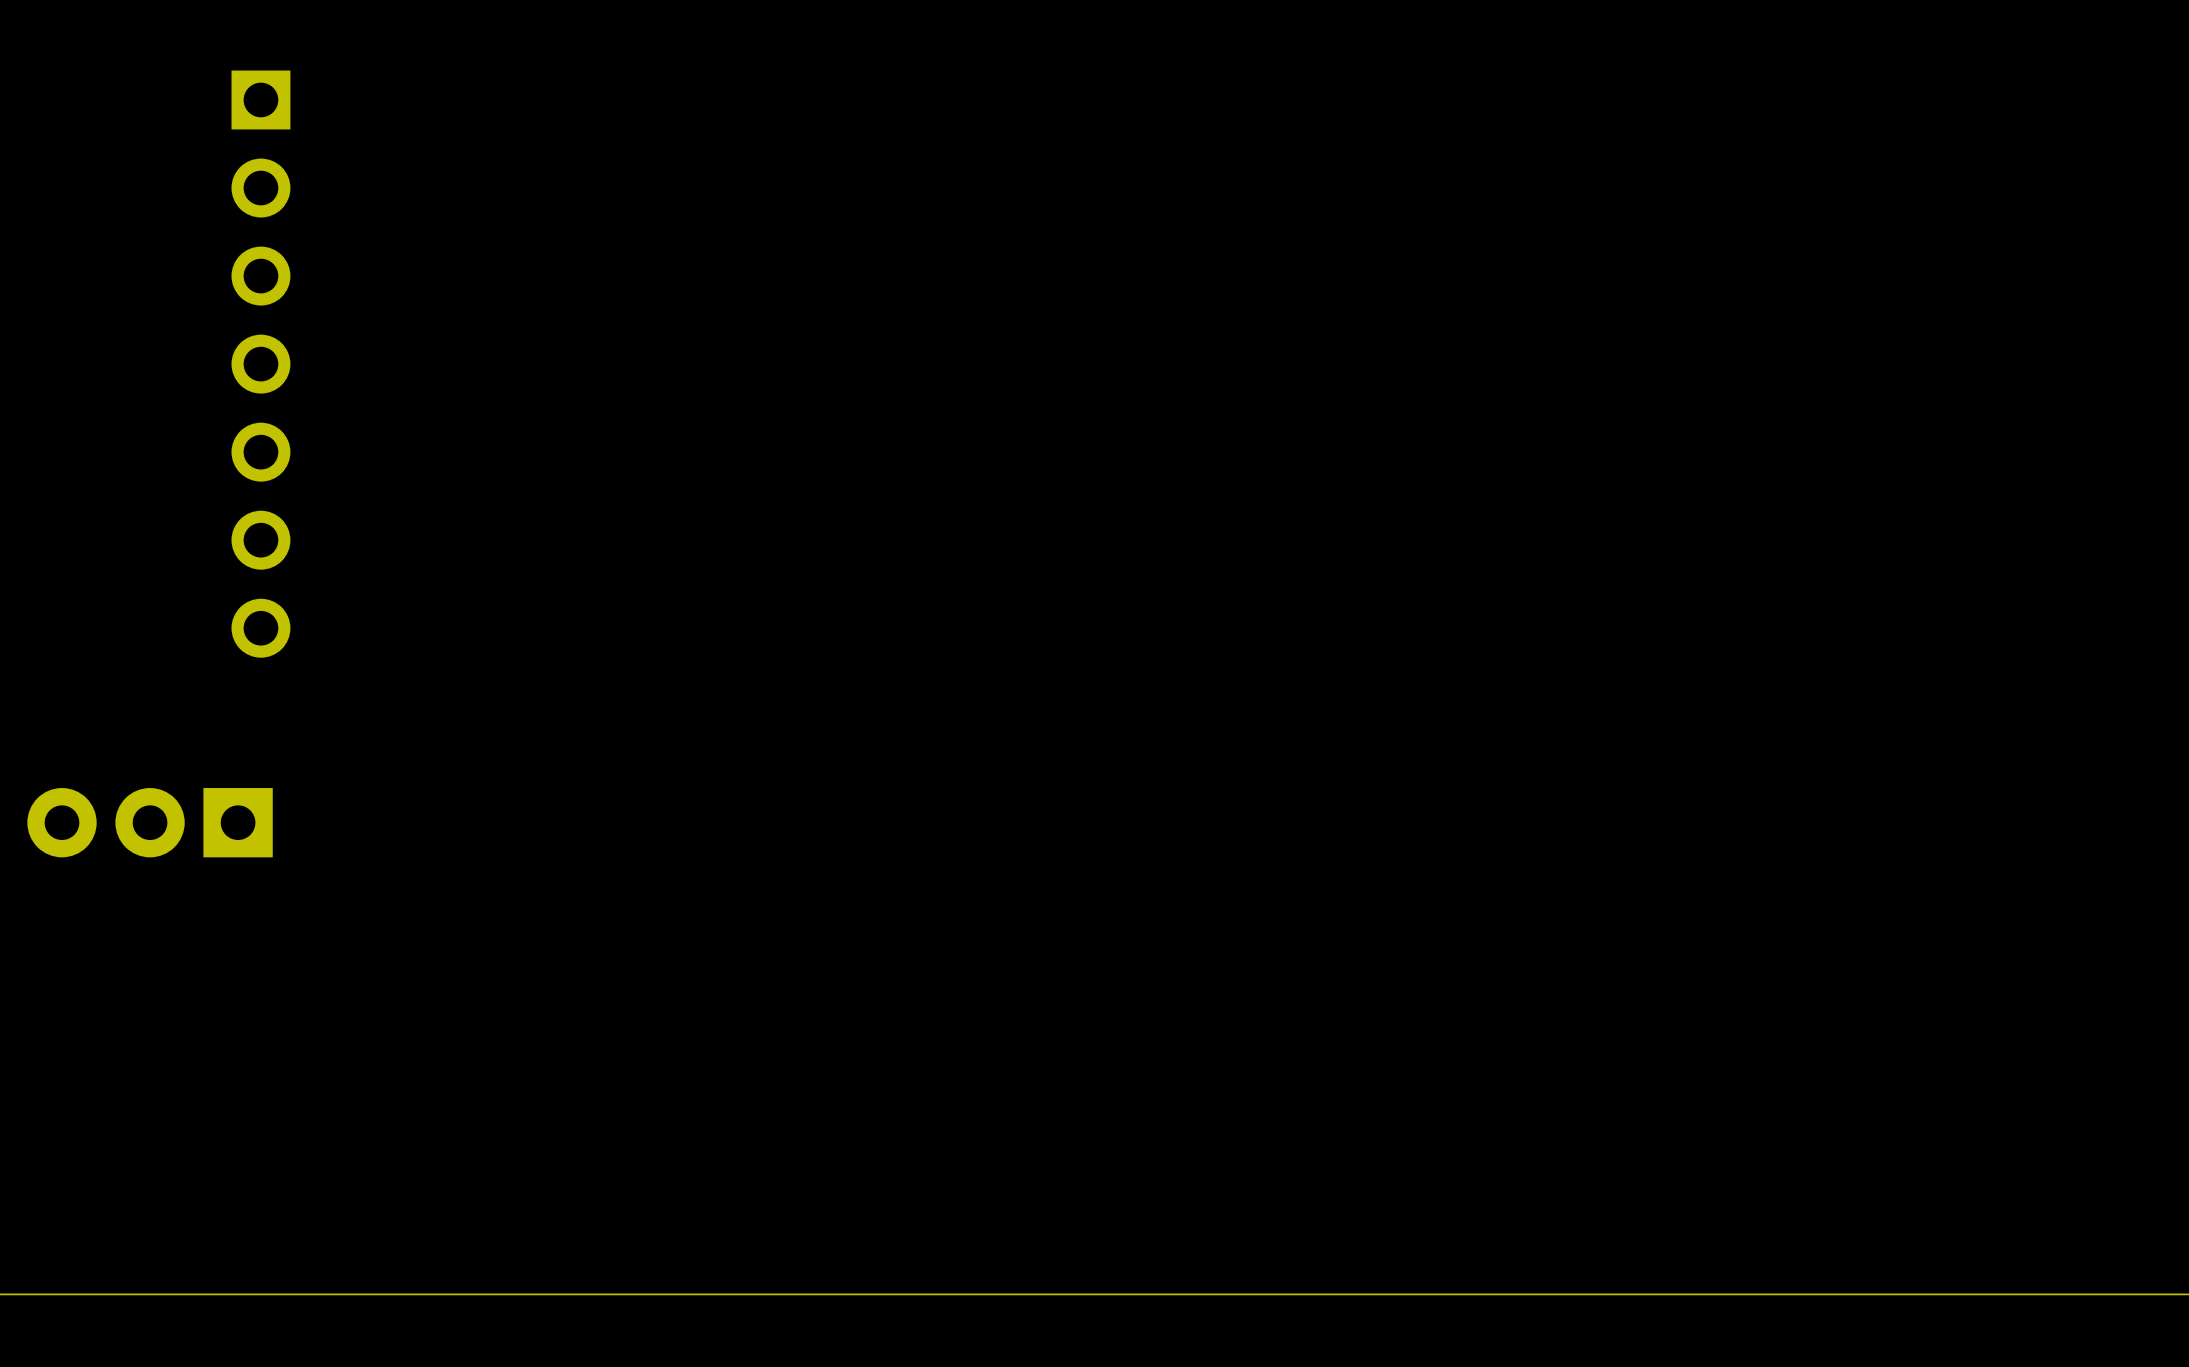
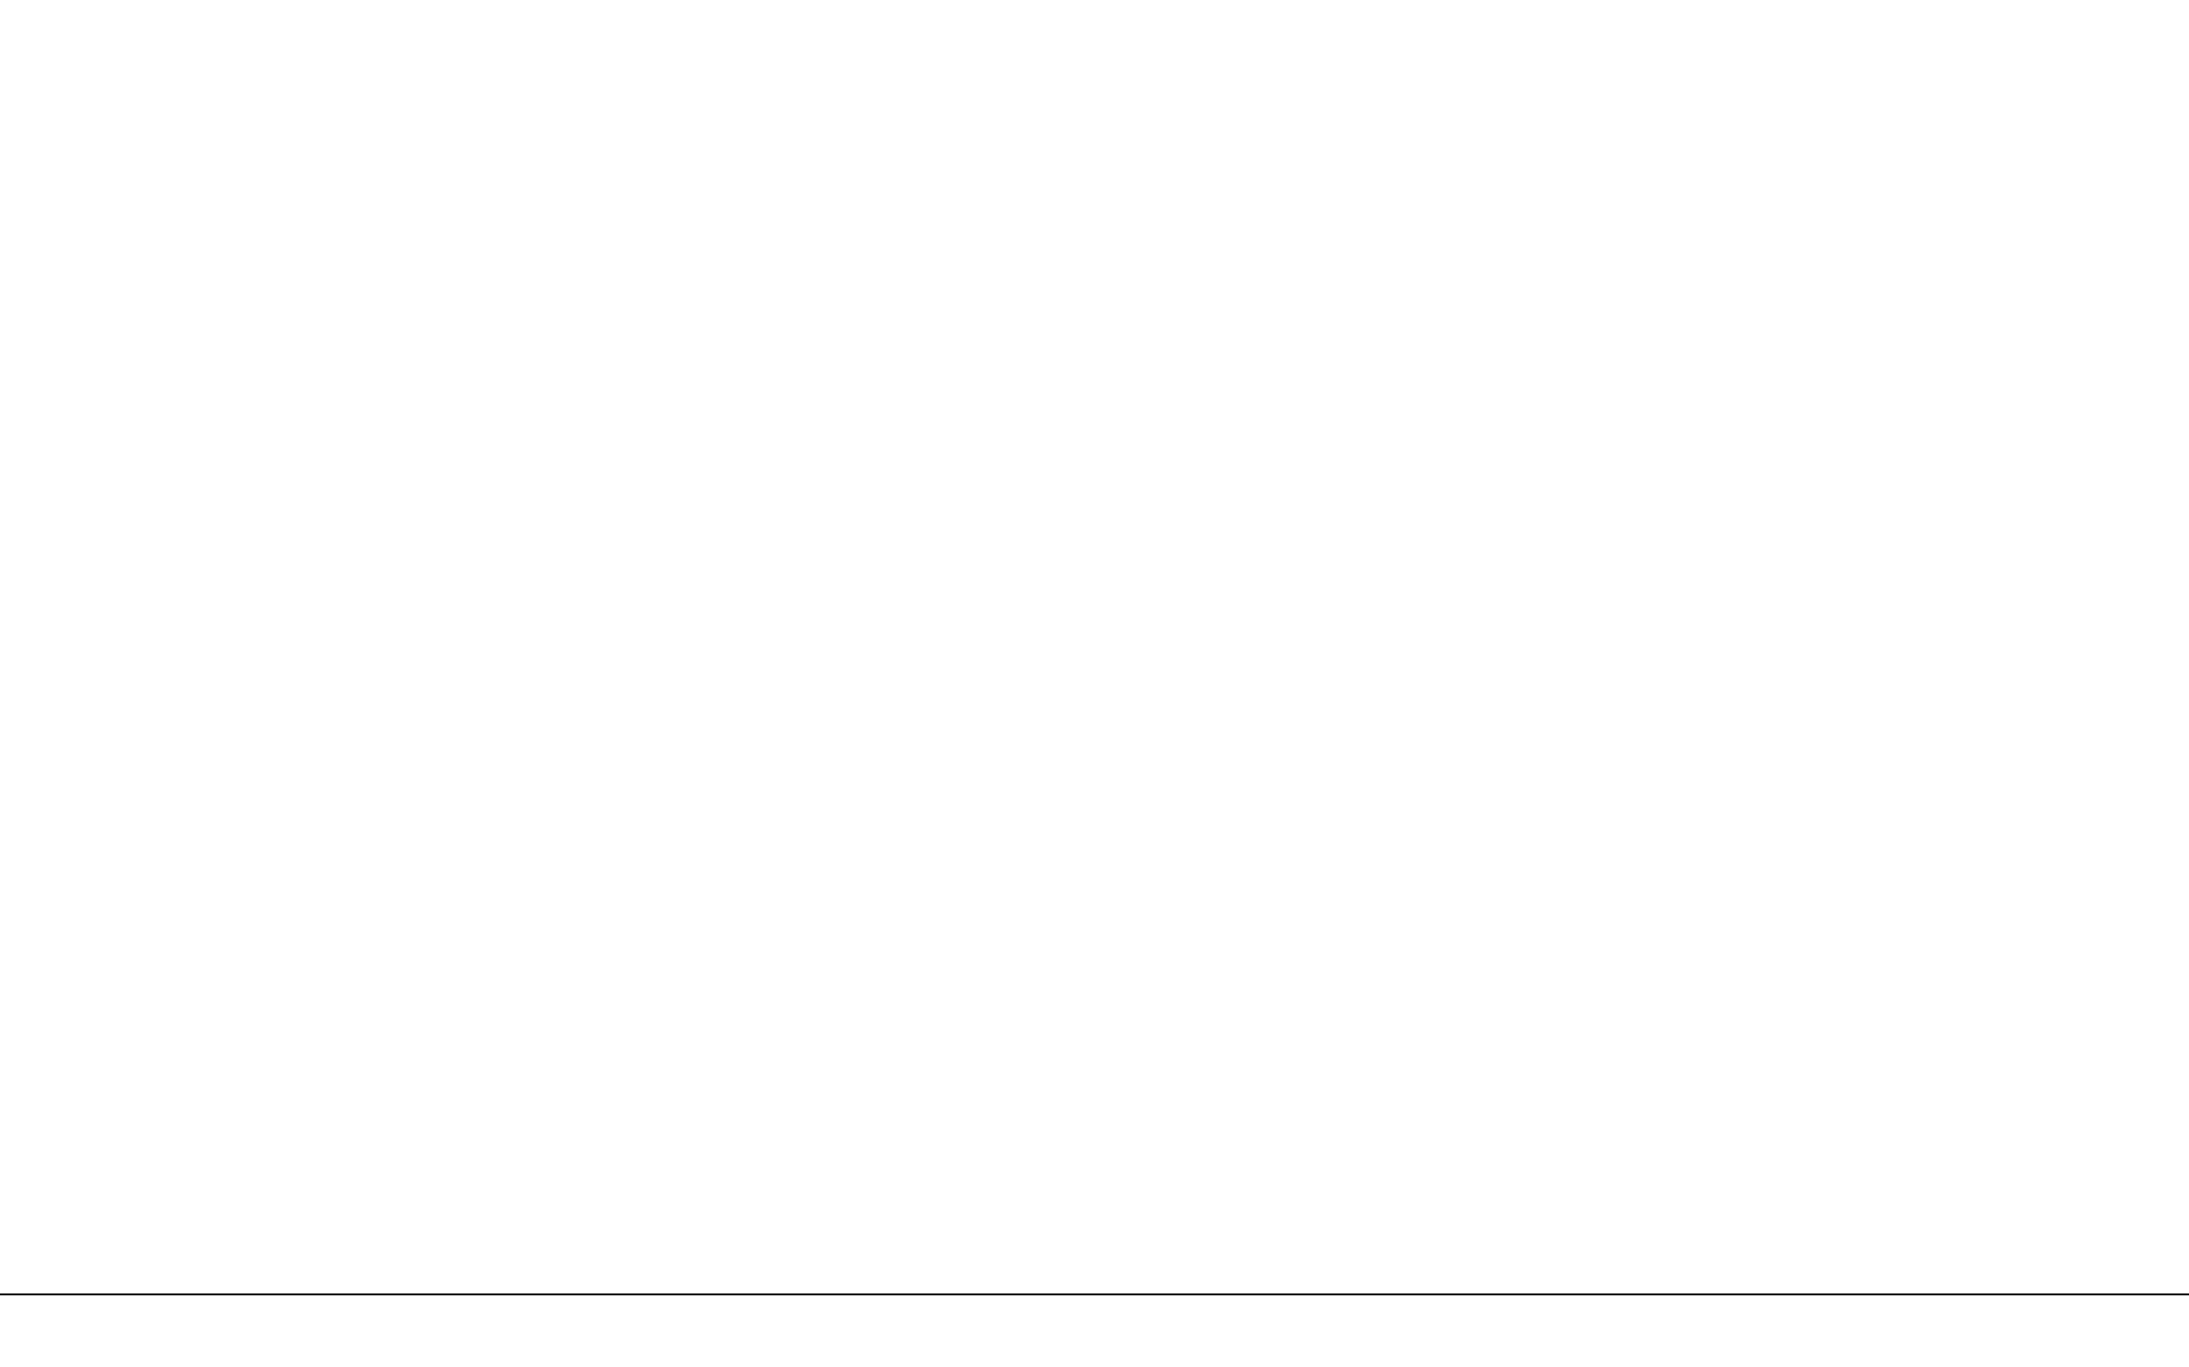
part: (260, 364) -> none
part: (150, 822) -> none

